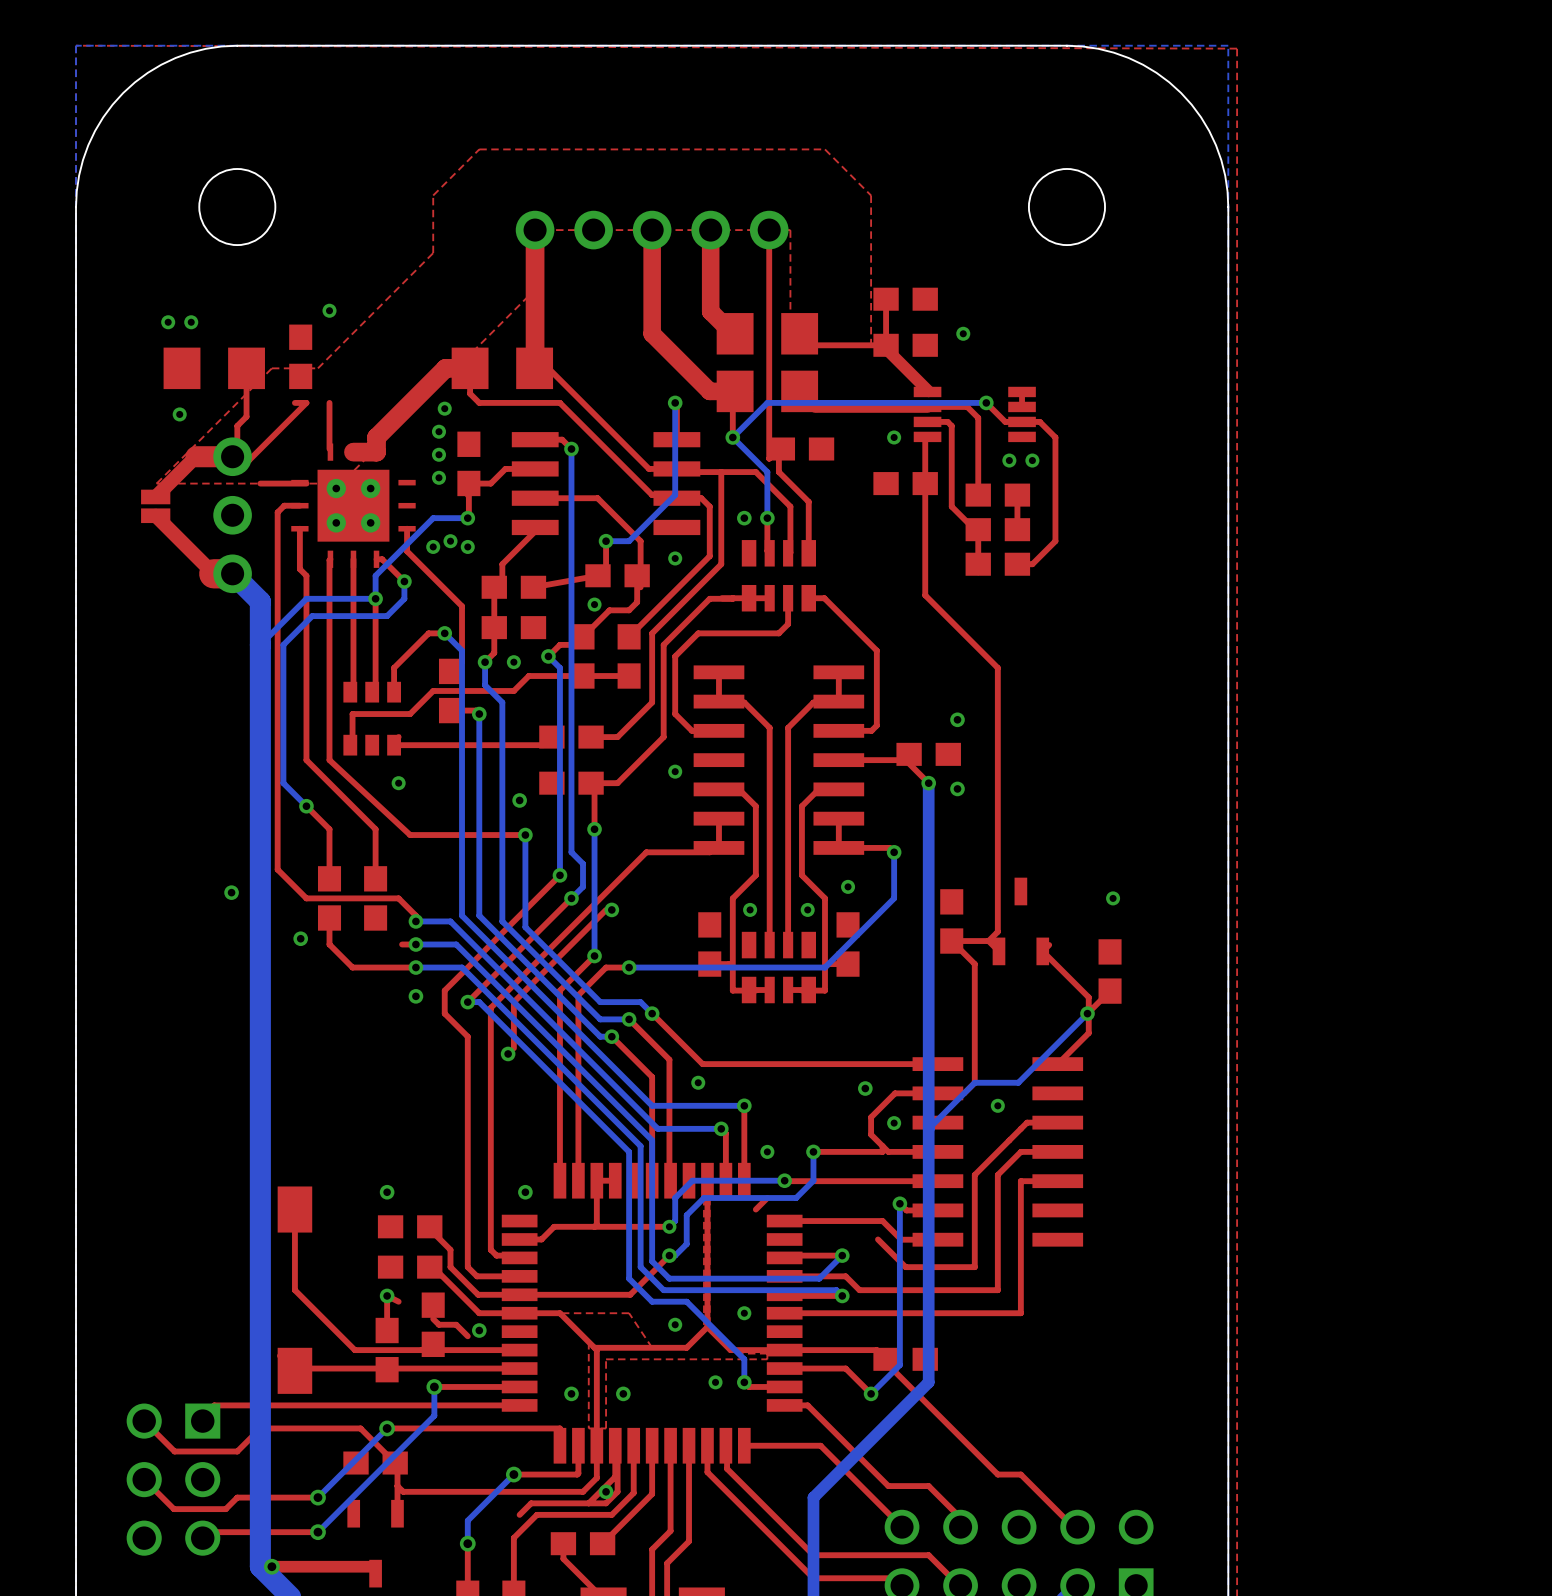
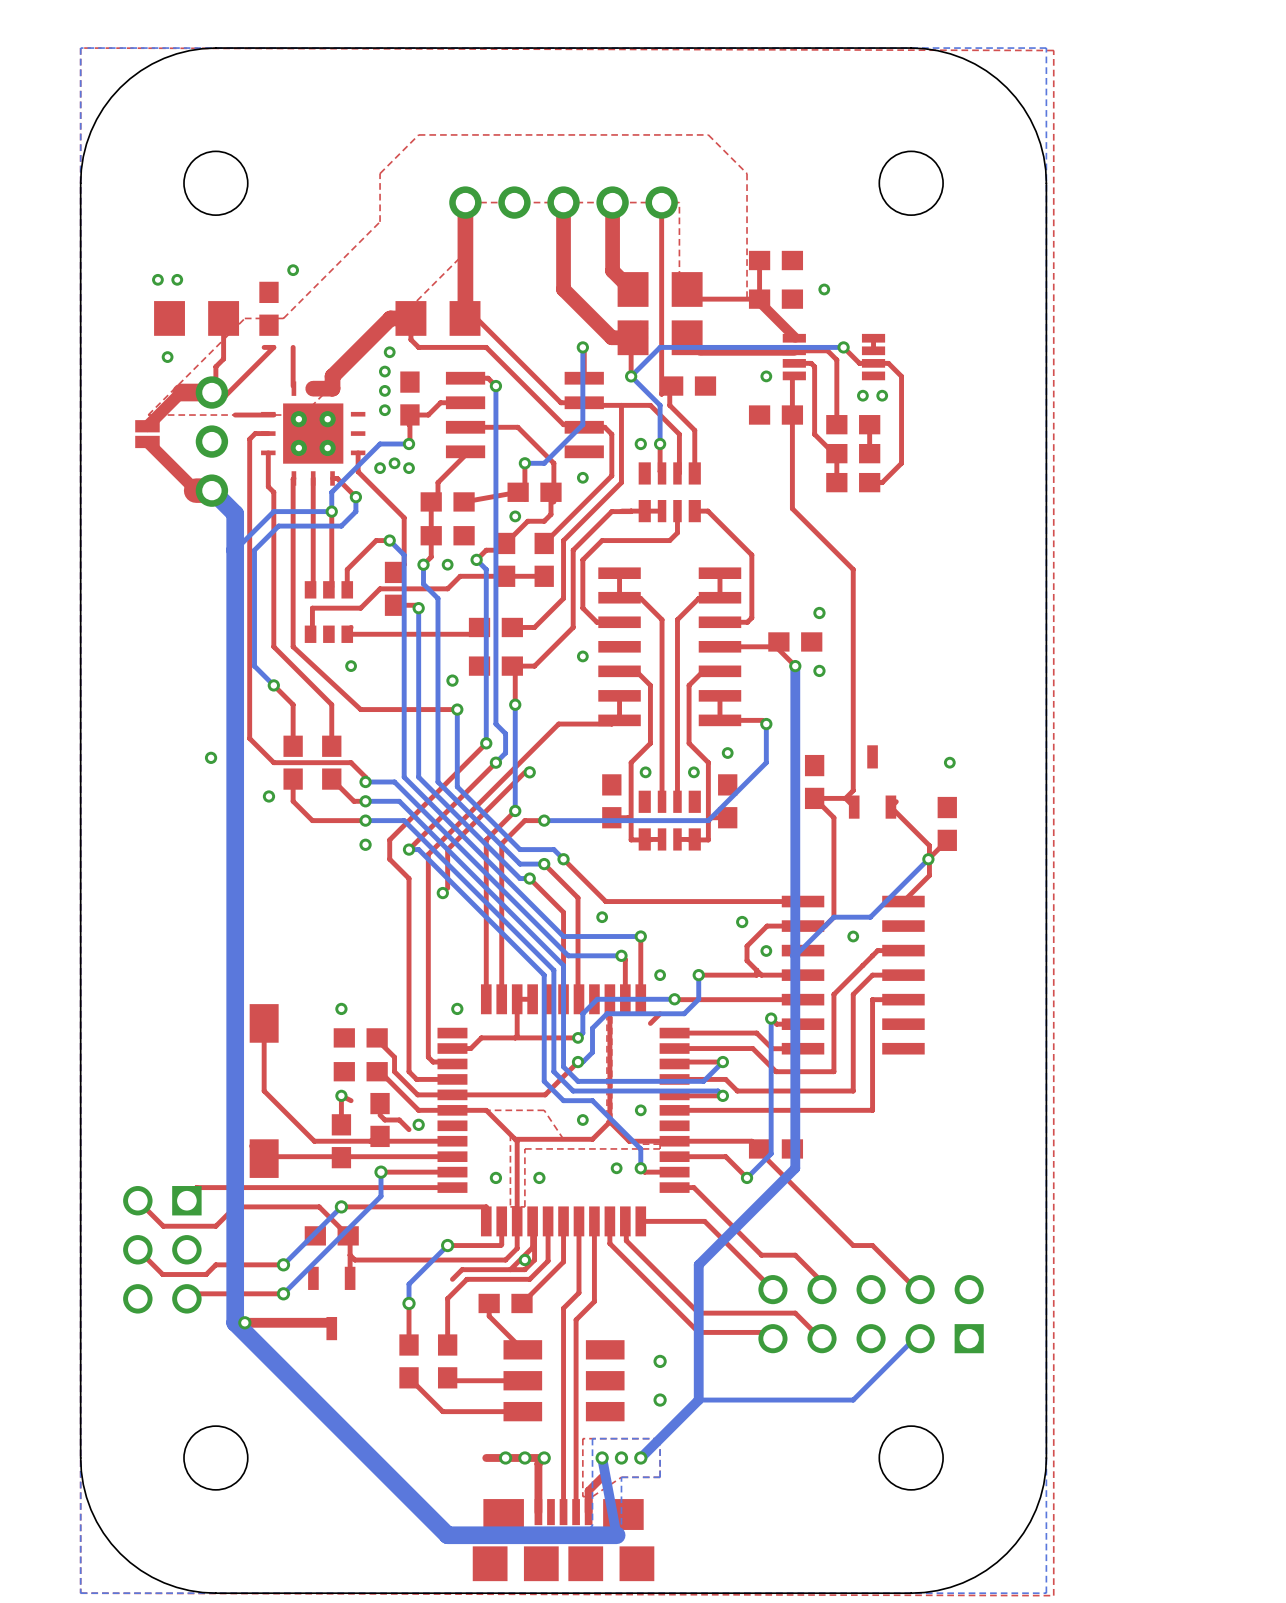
top track: none -> (338, 779) (331, 779) (353, 801)
top track: none -> (752, 1048) (674, 1048)

